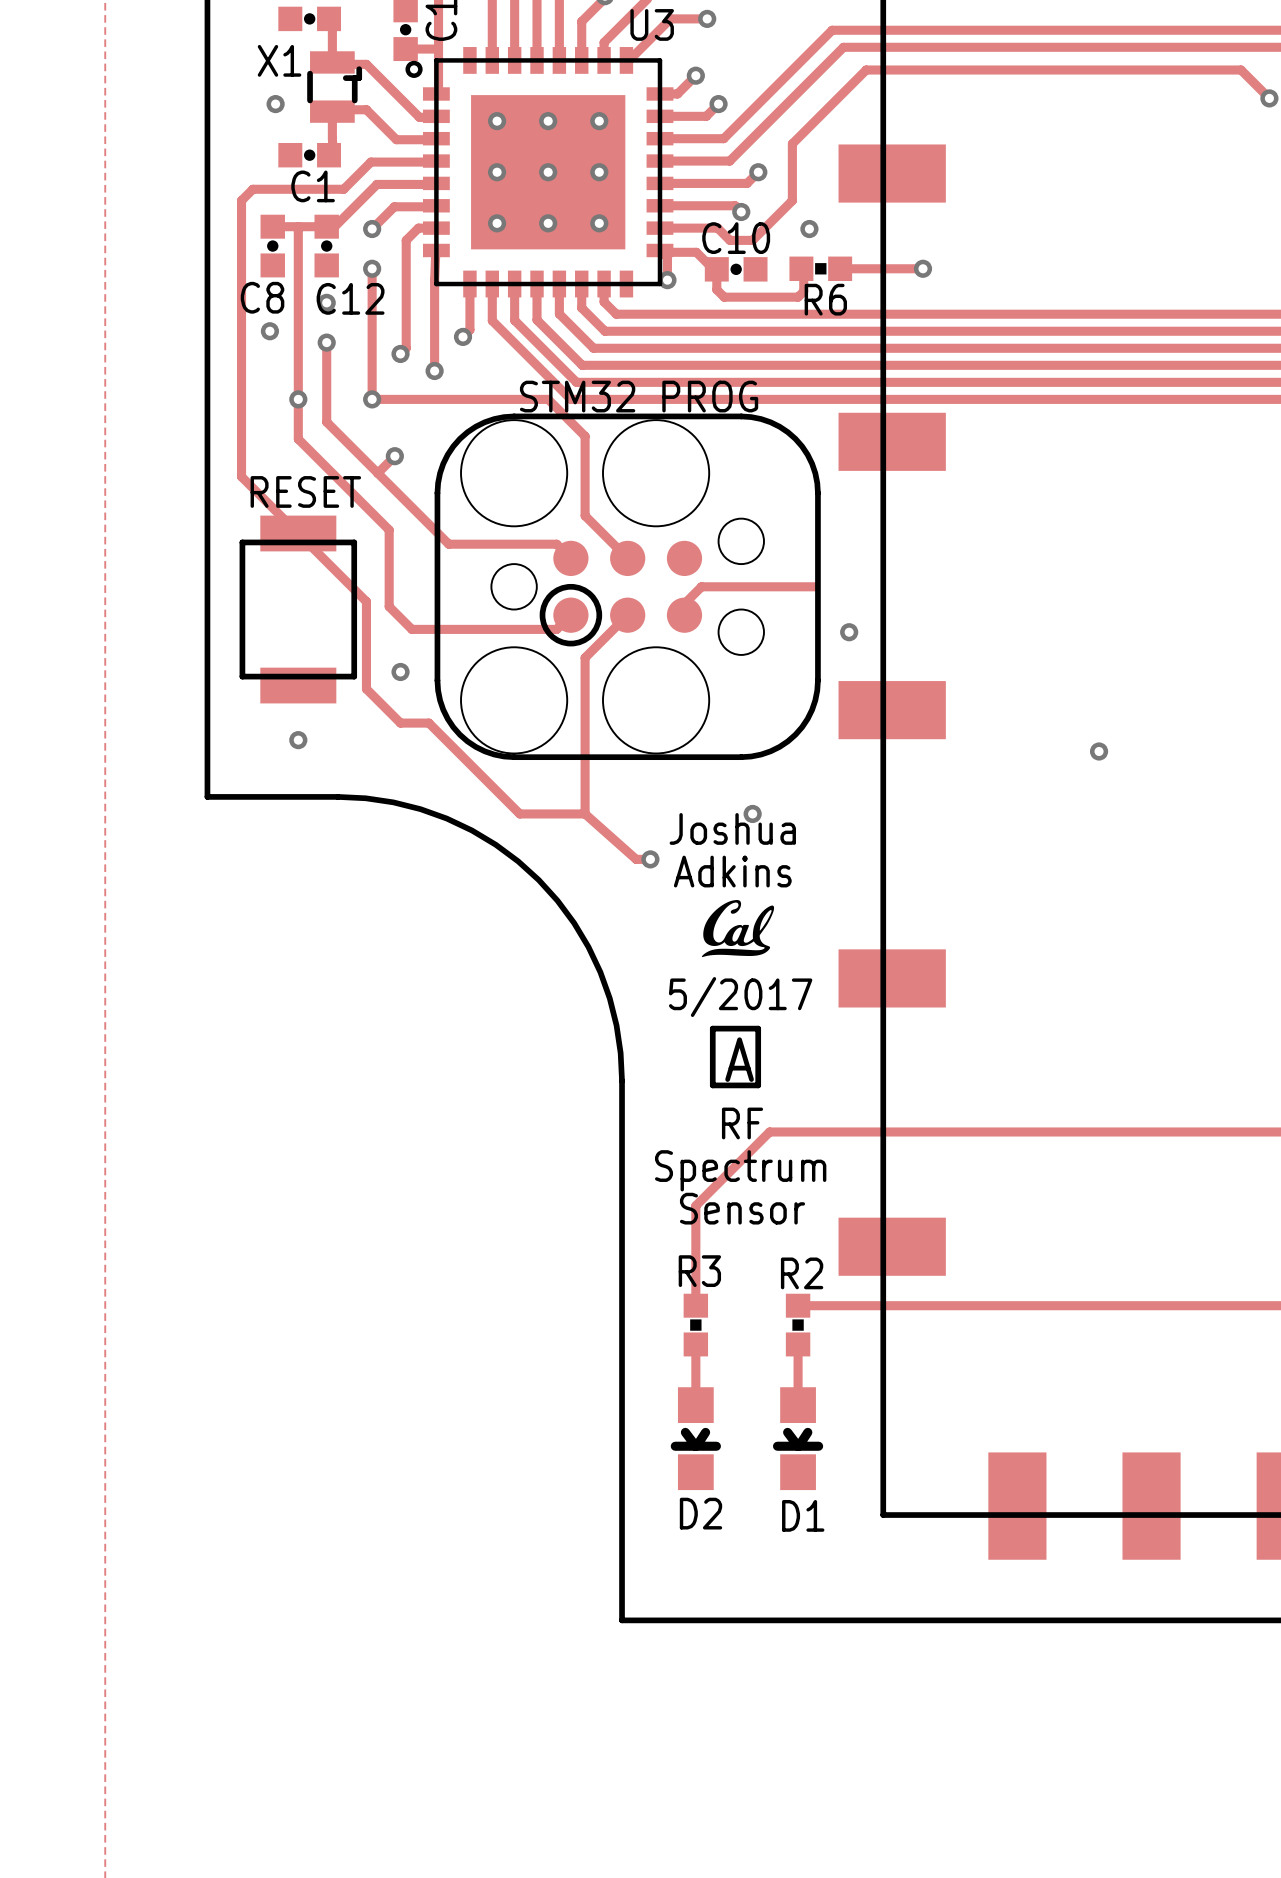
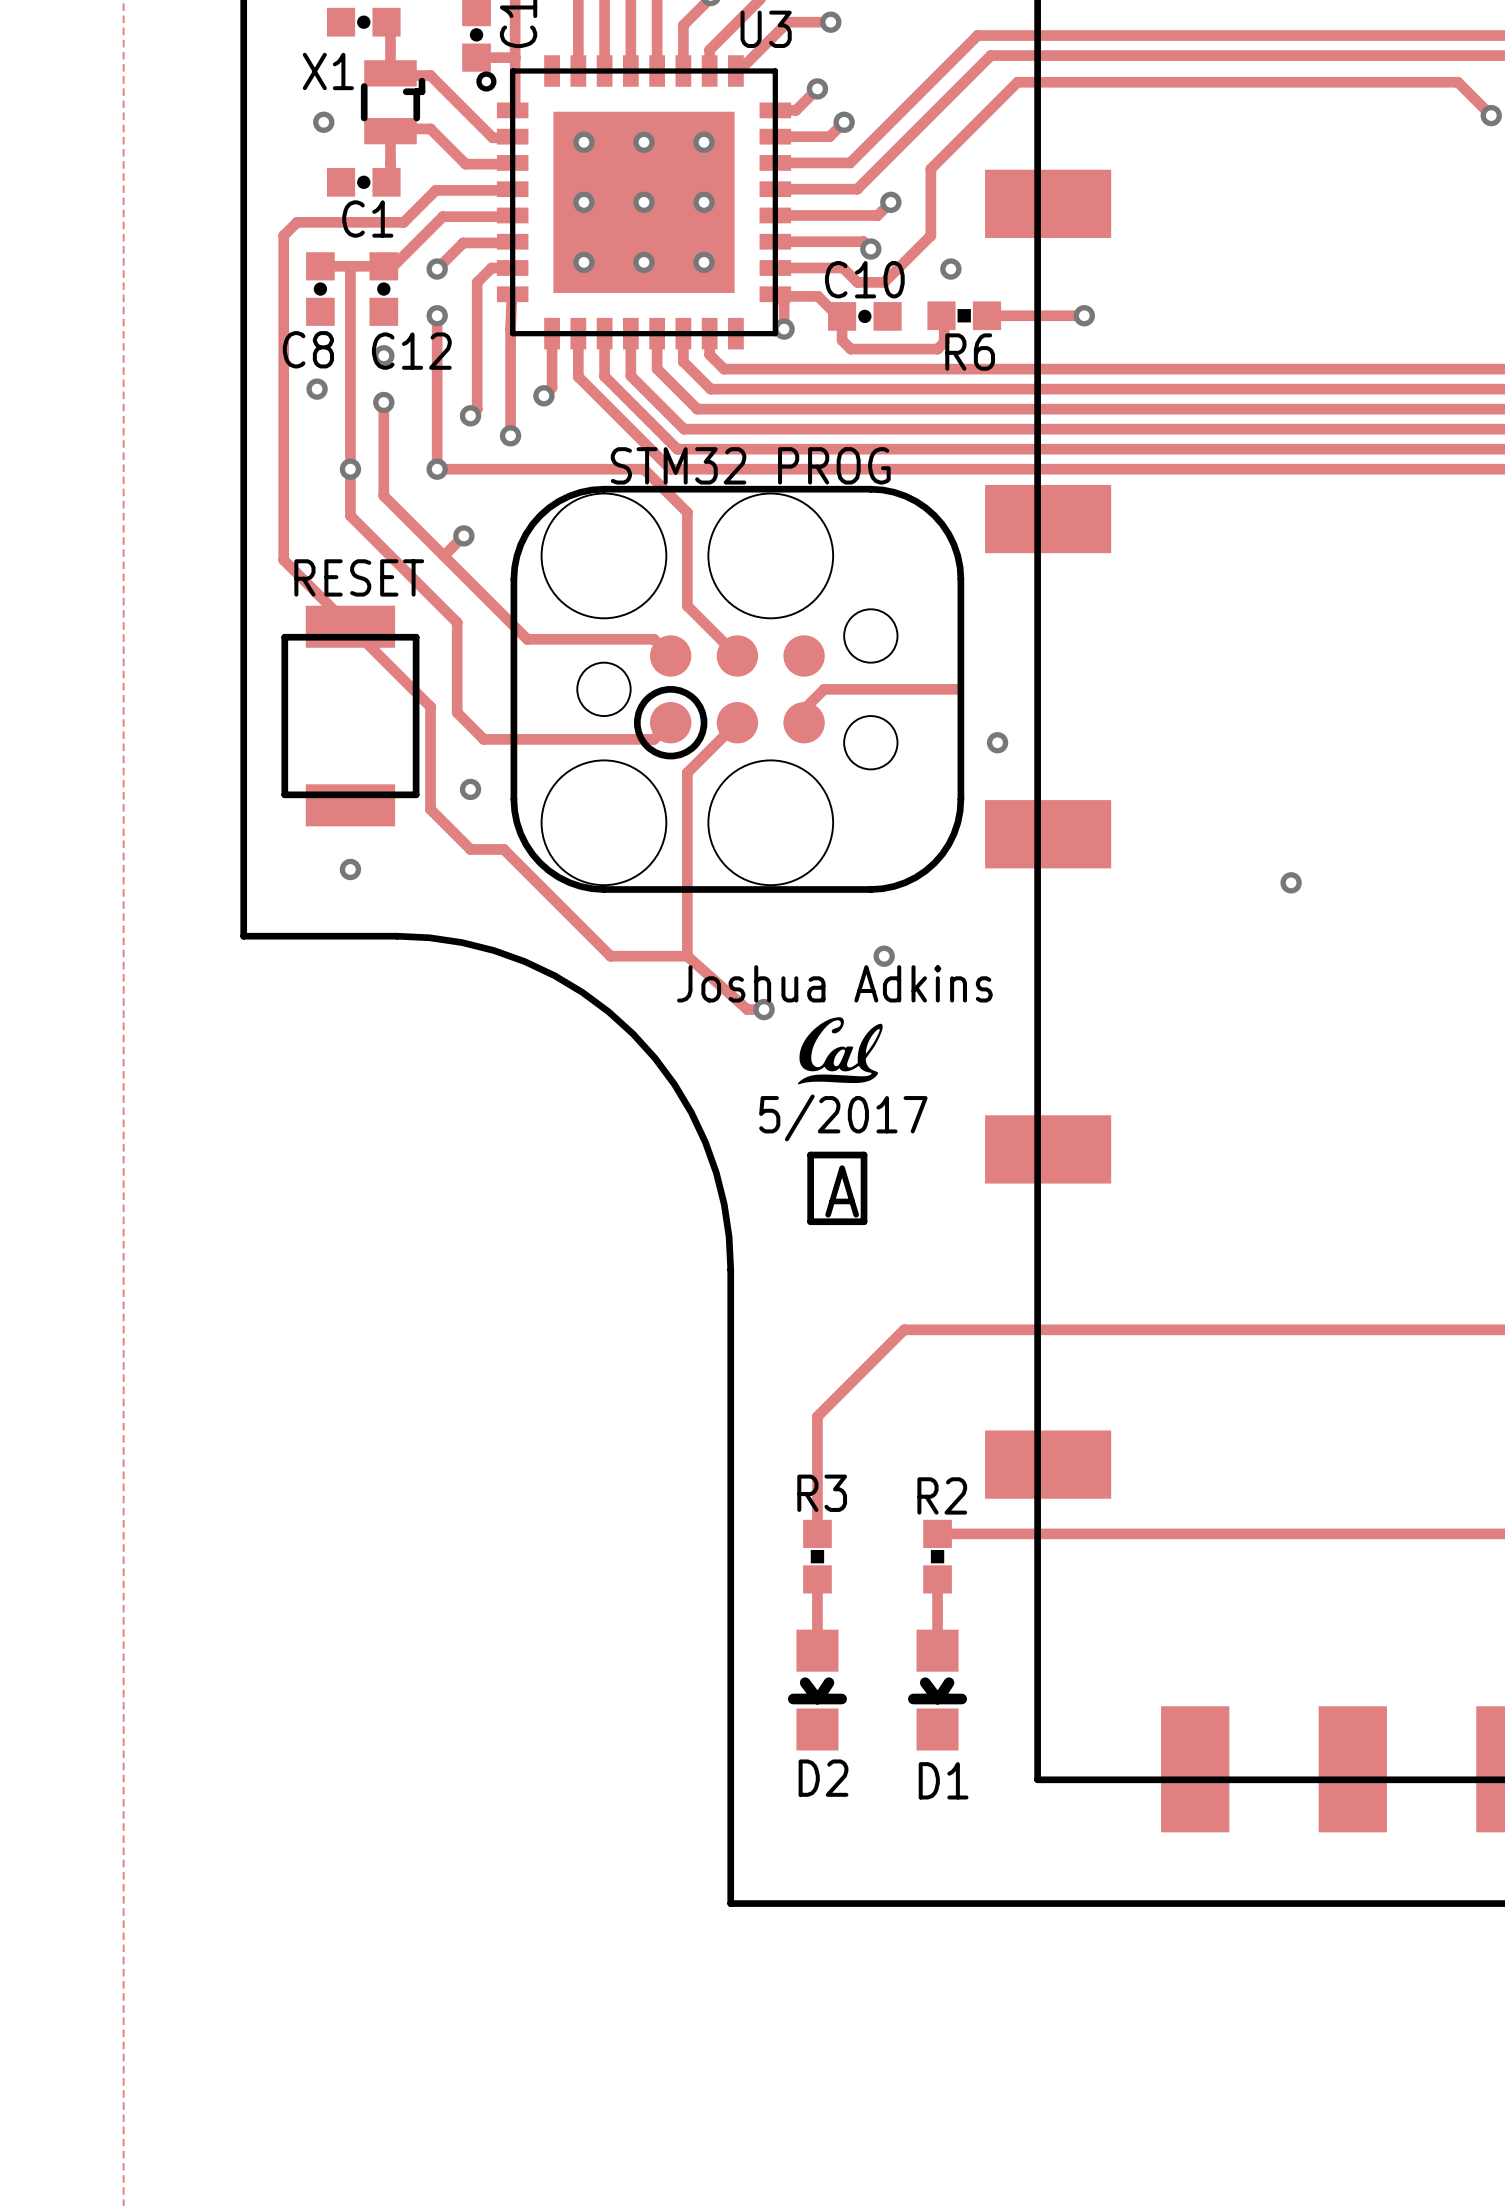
text: Joshua (732, 828) -> none
text: none -> Joshua Adkins (834, 983)
text: Adkins (732, 871) -> none
drawing position: (737, 928) -> (840, 1050)
text position: 5/2017 (740, 997) -> 5/2017 (843, 1117)
line: (712, 1028) (712, 1085) (758, 1085) (758, 1028) (712, 1028) -> (810, 1155) (810, 1221) (864, 1221) (864, 1155) (810, 1155)
text position: A (739, 1059) -> A (842, 1191)
text: RF (742, 1123) -> none
text: Spectrum (740, 1170) -> none
text: Sensor (742, 1208) -> none

